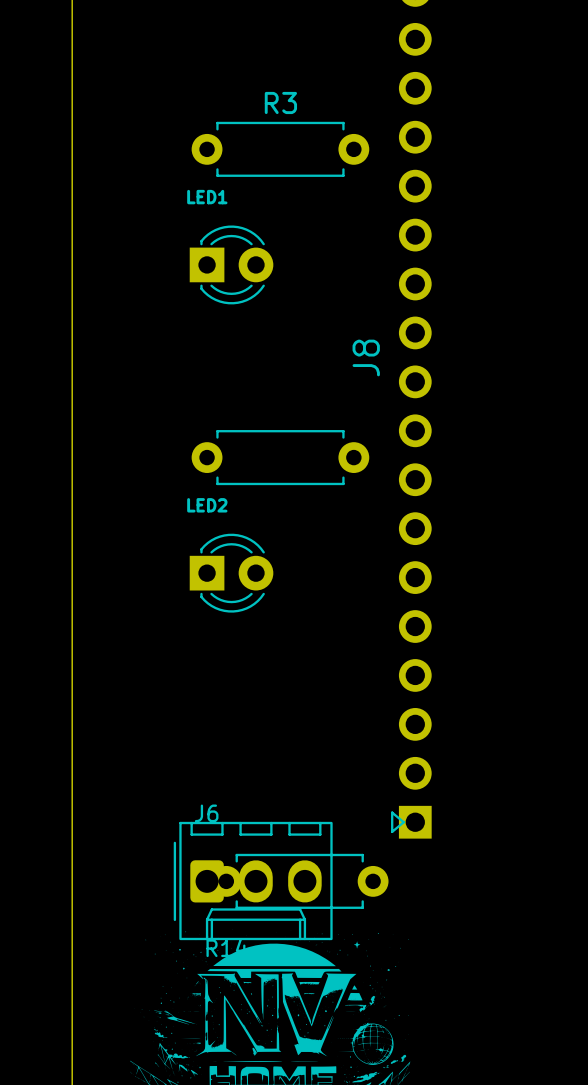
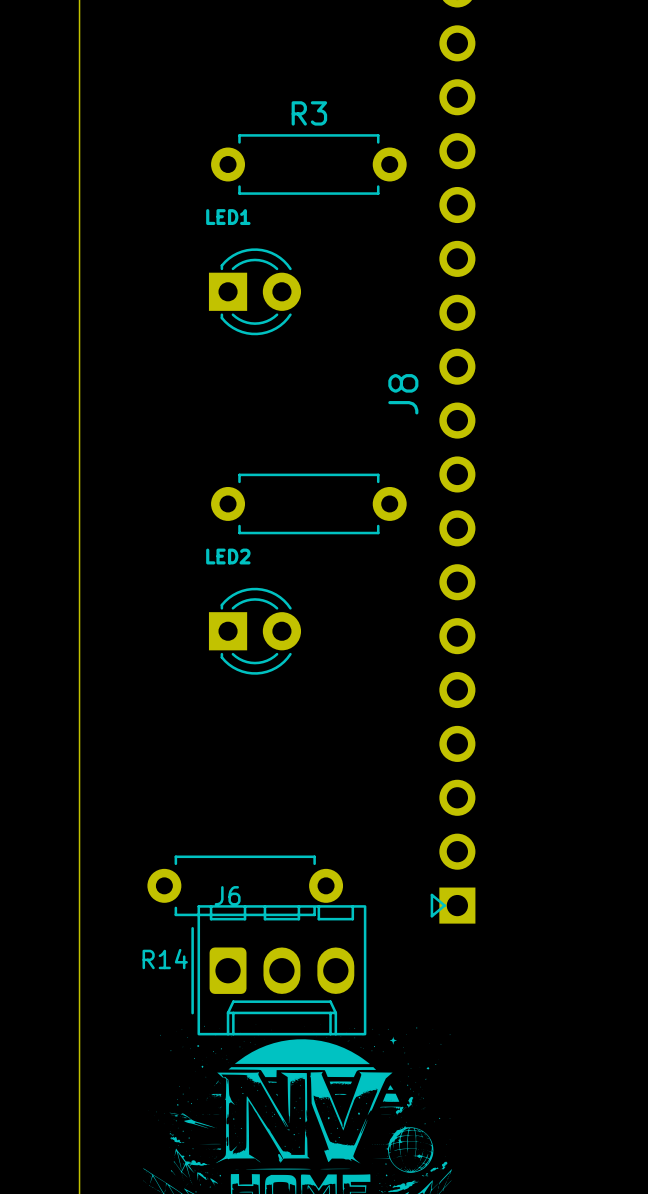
R14 position: (299, 881) -> (245, 885)

